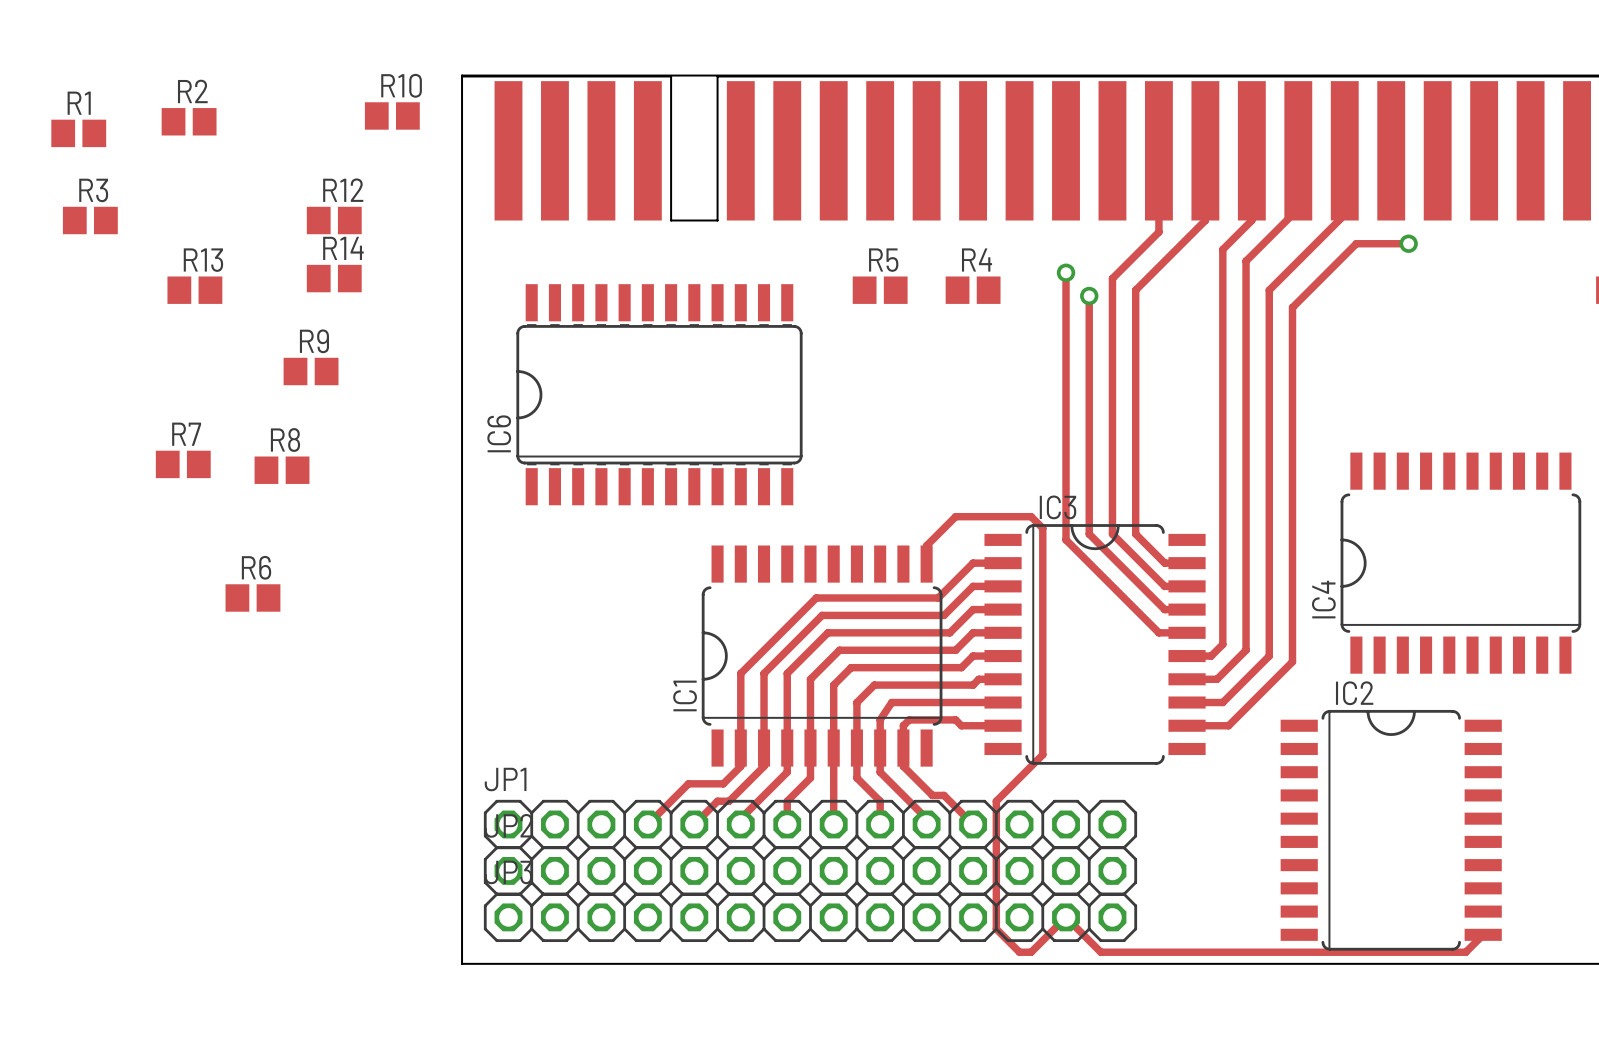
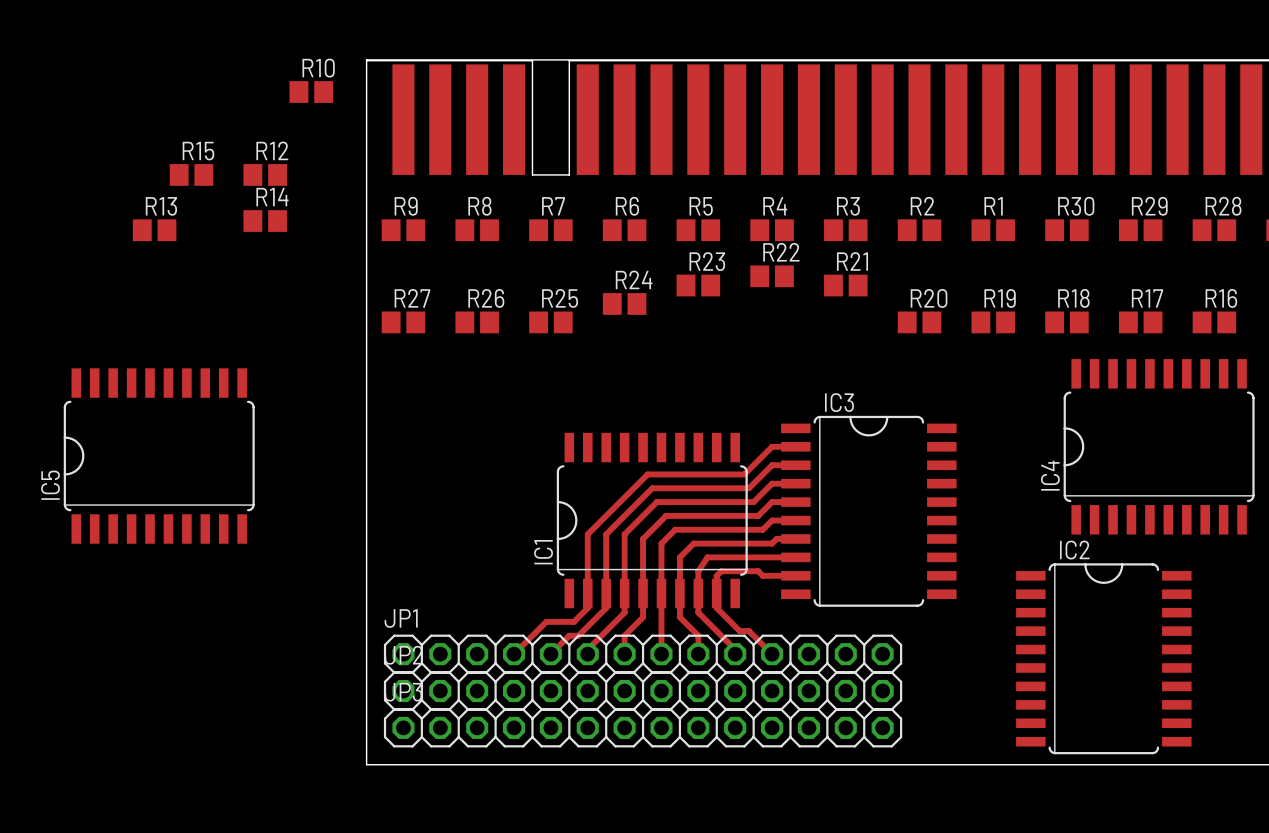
R2 position: (189, 121) -> (919, 230)
R1 position: (78, 133) -> (993, 230)
track: (1158, 150) (1158, 232) (1112, 278) (1112, 534) (1164, 586) (1187, 586) -> none
track: (1205, 150) (1205, 220) (1135, 290) (1135, 534) (1164, 563) (1187, 563) -> none
track: (1251, 150) (1251, 220) (1222, 249) (1222, 644) (1211, 656) (1187, 656) -> none
track: (1298, 150) (1298, 208) (1246, 261) (1246, 650) (1217, 679) (1187, 679) -> none
track: (1344, 150) (1344, 214) (1269, 290) (1269, 656) (1222, 702) (1187, 702) -> none
R3 position: (90, 220) -> (845, 230)
R15: none -> (191, 174)
track: (1408, 243) (1356, 243) (1292, 307) (1292, 661) (1228, 725) (1187, 725) -> none
via: (1408, 243) -> none
track: (1066, 272) (1066, 539) (1158, 632) (1187, 632) -> none
via: (1066, 272) -> none
R30: none -> (1066, 230)
R29: none -> (1140, 230)
R28: none -> (1214, 230)
track: (1089, 296) (1089, 534) (1164, 609) (1187, 609) -> none
via: (1089, 296) -> none
R22: none -> (772, 276)
R23: none -> (698, 285)
R21: none -> (845, 285)
R9 position: (311, 371) -> (403, 230)
R24: none -> (624, 303)
IC6: (659, 394) -> none
R27: none -> (403, 322)
R26: none -> (477, 322)
R25: none -> (550, 322)
R20: none -> (919, 322)
R19: none -> (993, 322)
R18: none -> (1066, 322)
R17: none -> (1140, 322)
R16: none -> (1214, 322)
R7 position: (183, 464) -> (550, 230)
R8 position: (282, 470) -> (477, 230)
track: (926, 564) (926, 545) (955, 516) (1031, 516) (1042, 528) (1042, 754) (996, 801) (996, 929) (1019, 952) (1031, 952) (1066, 917) (1100, 952) (1465, 952) (1483, 934) -> none
IC5: none -> (159, 456)
R6 position: (252, 597) -> (624, 230)

